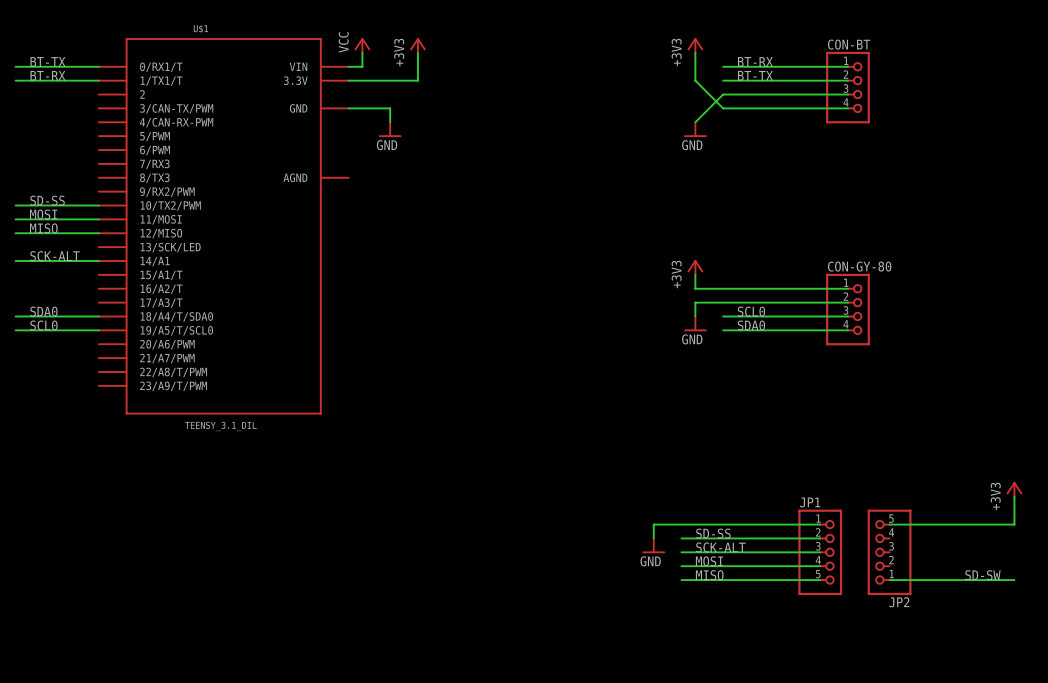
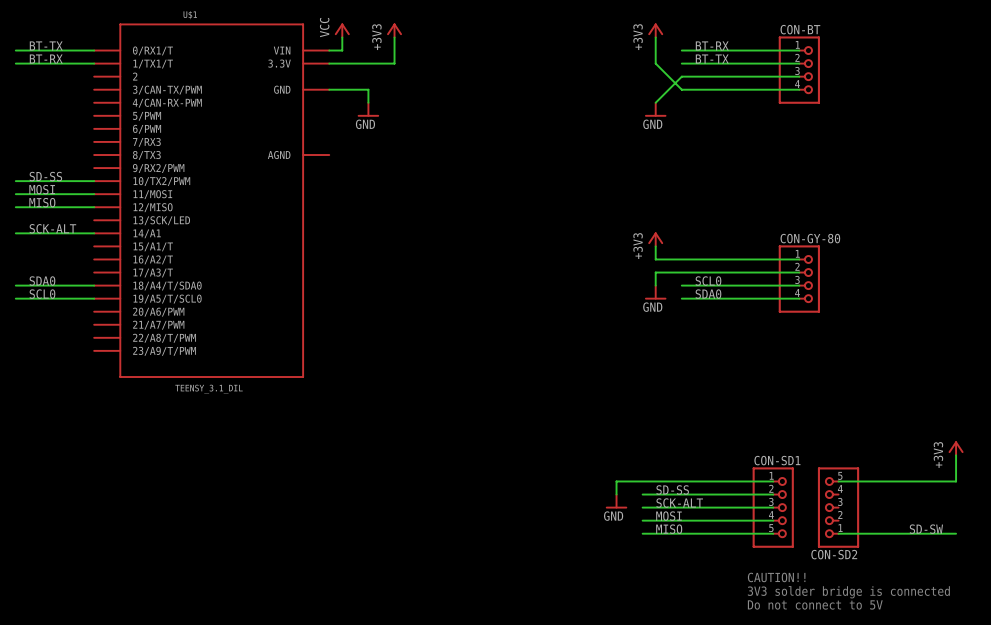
JP1 name: JP1 (810, 502) -> CON-SD1 (777, 460)
JP2 name: JP2 (899, 602) -> CON-SD2 (834, 554)
text: none -> CAUTION!! (776, 577)
text: none -> 3V3 solder bridge is connected (848, 592)
text: none -> Do not connect to 5V (815, 604)

